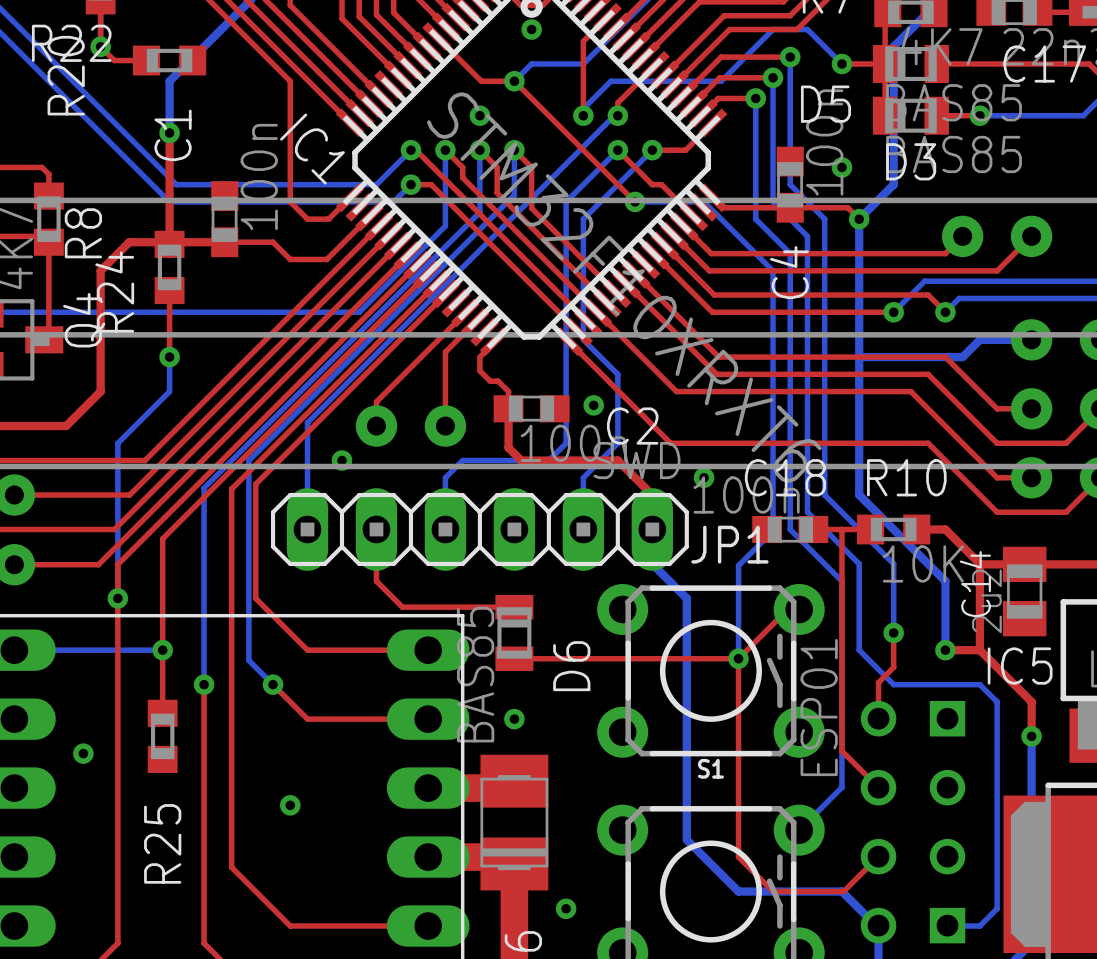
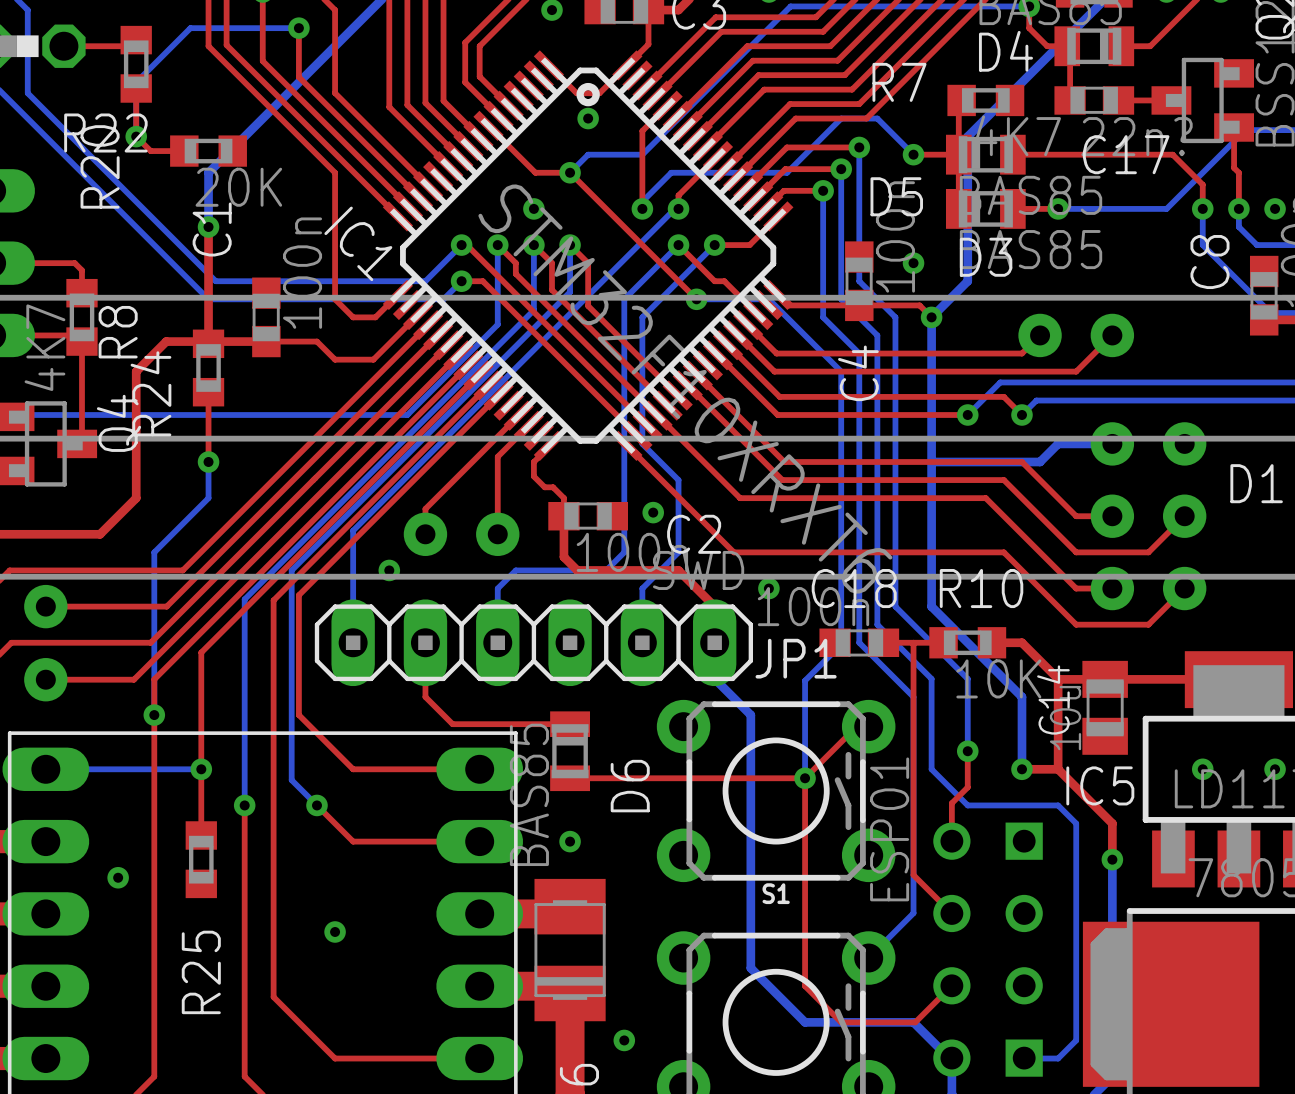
R22 value: none -> 20K (238, 187)
C14 value: 2u2 (986, 601) -> 10u (1065, 718)

